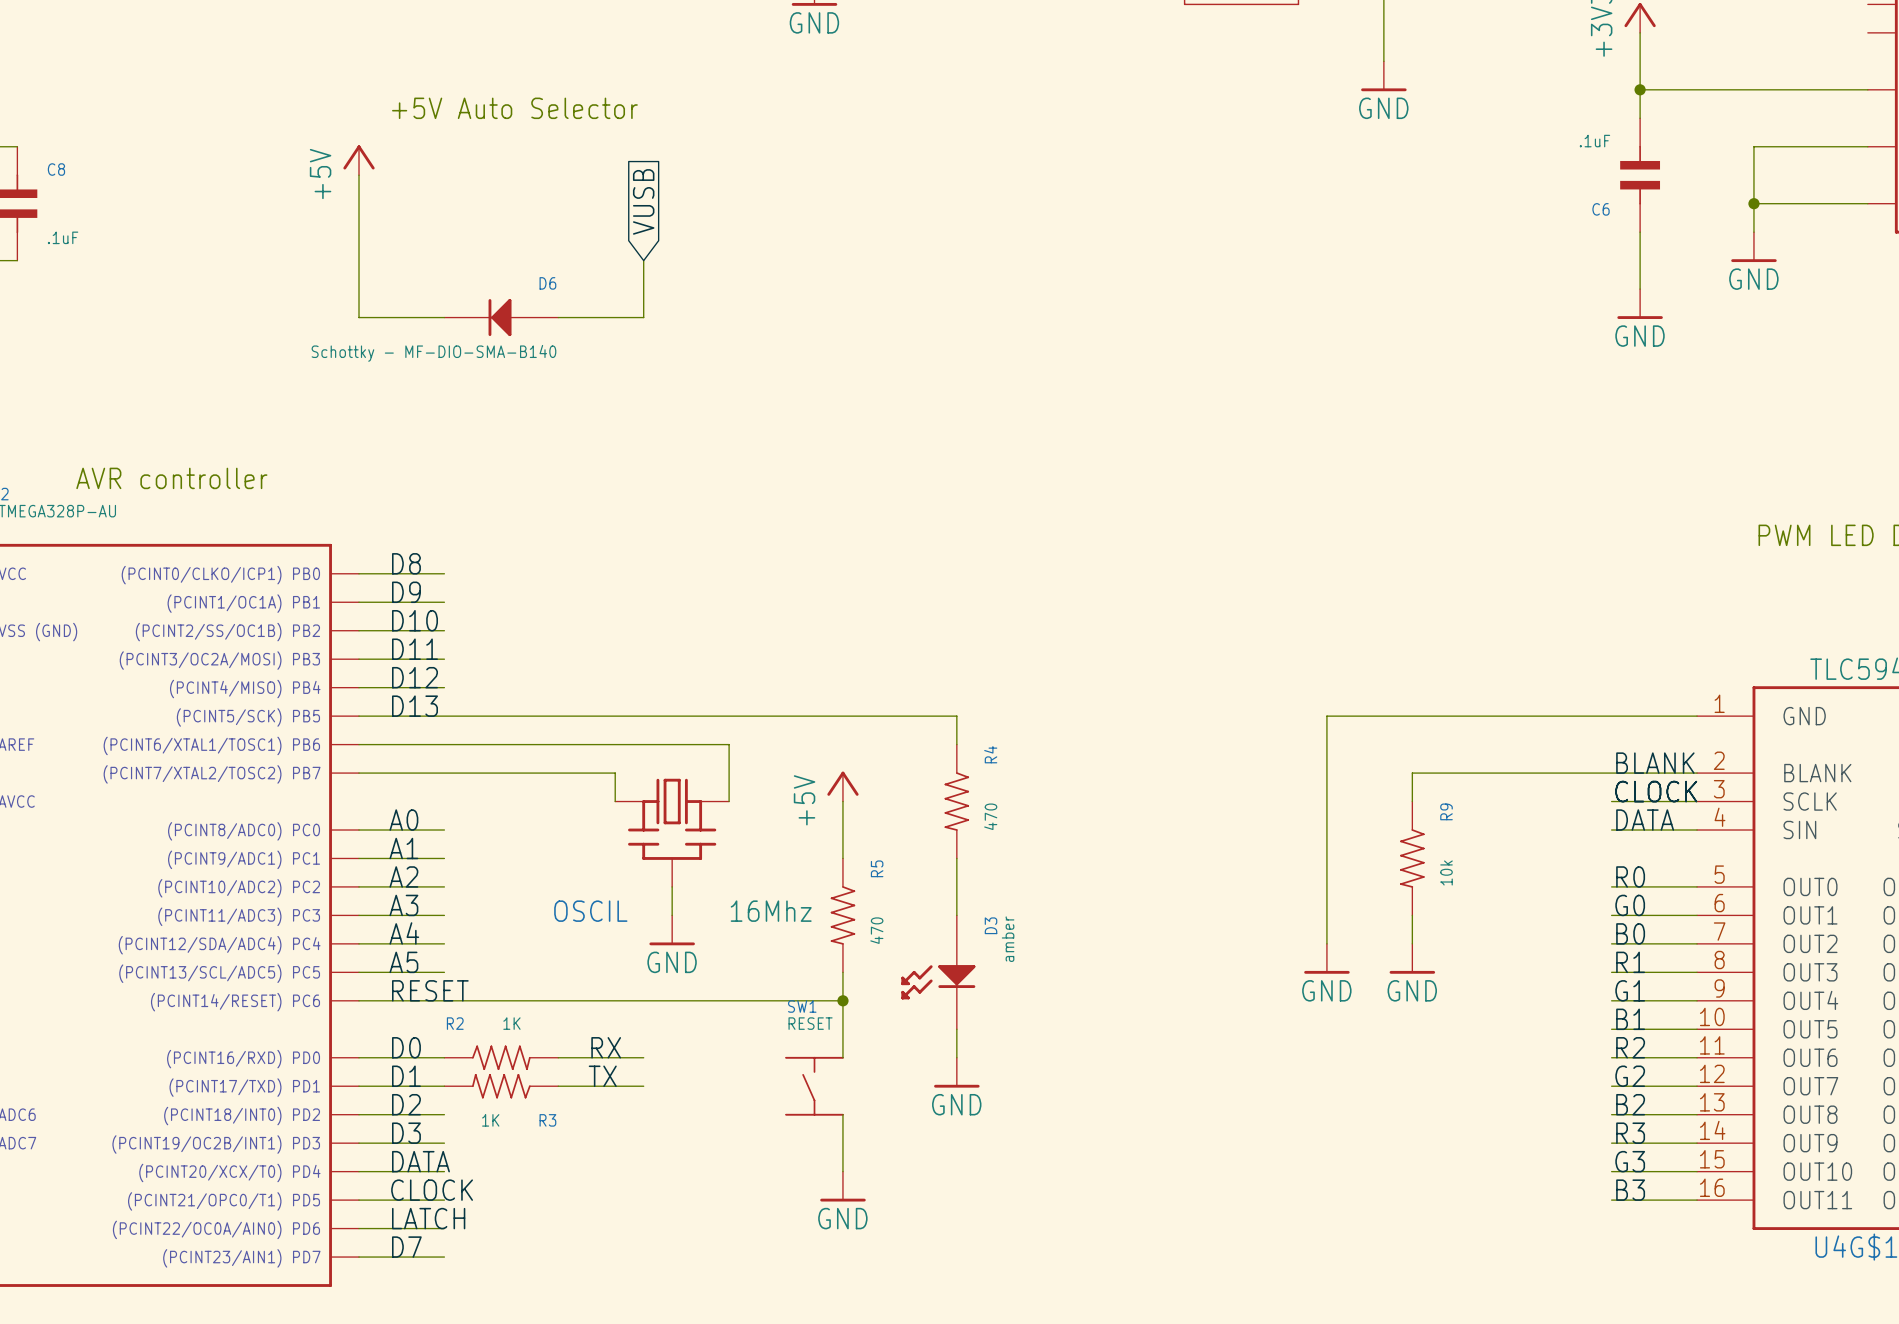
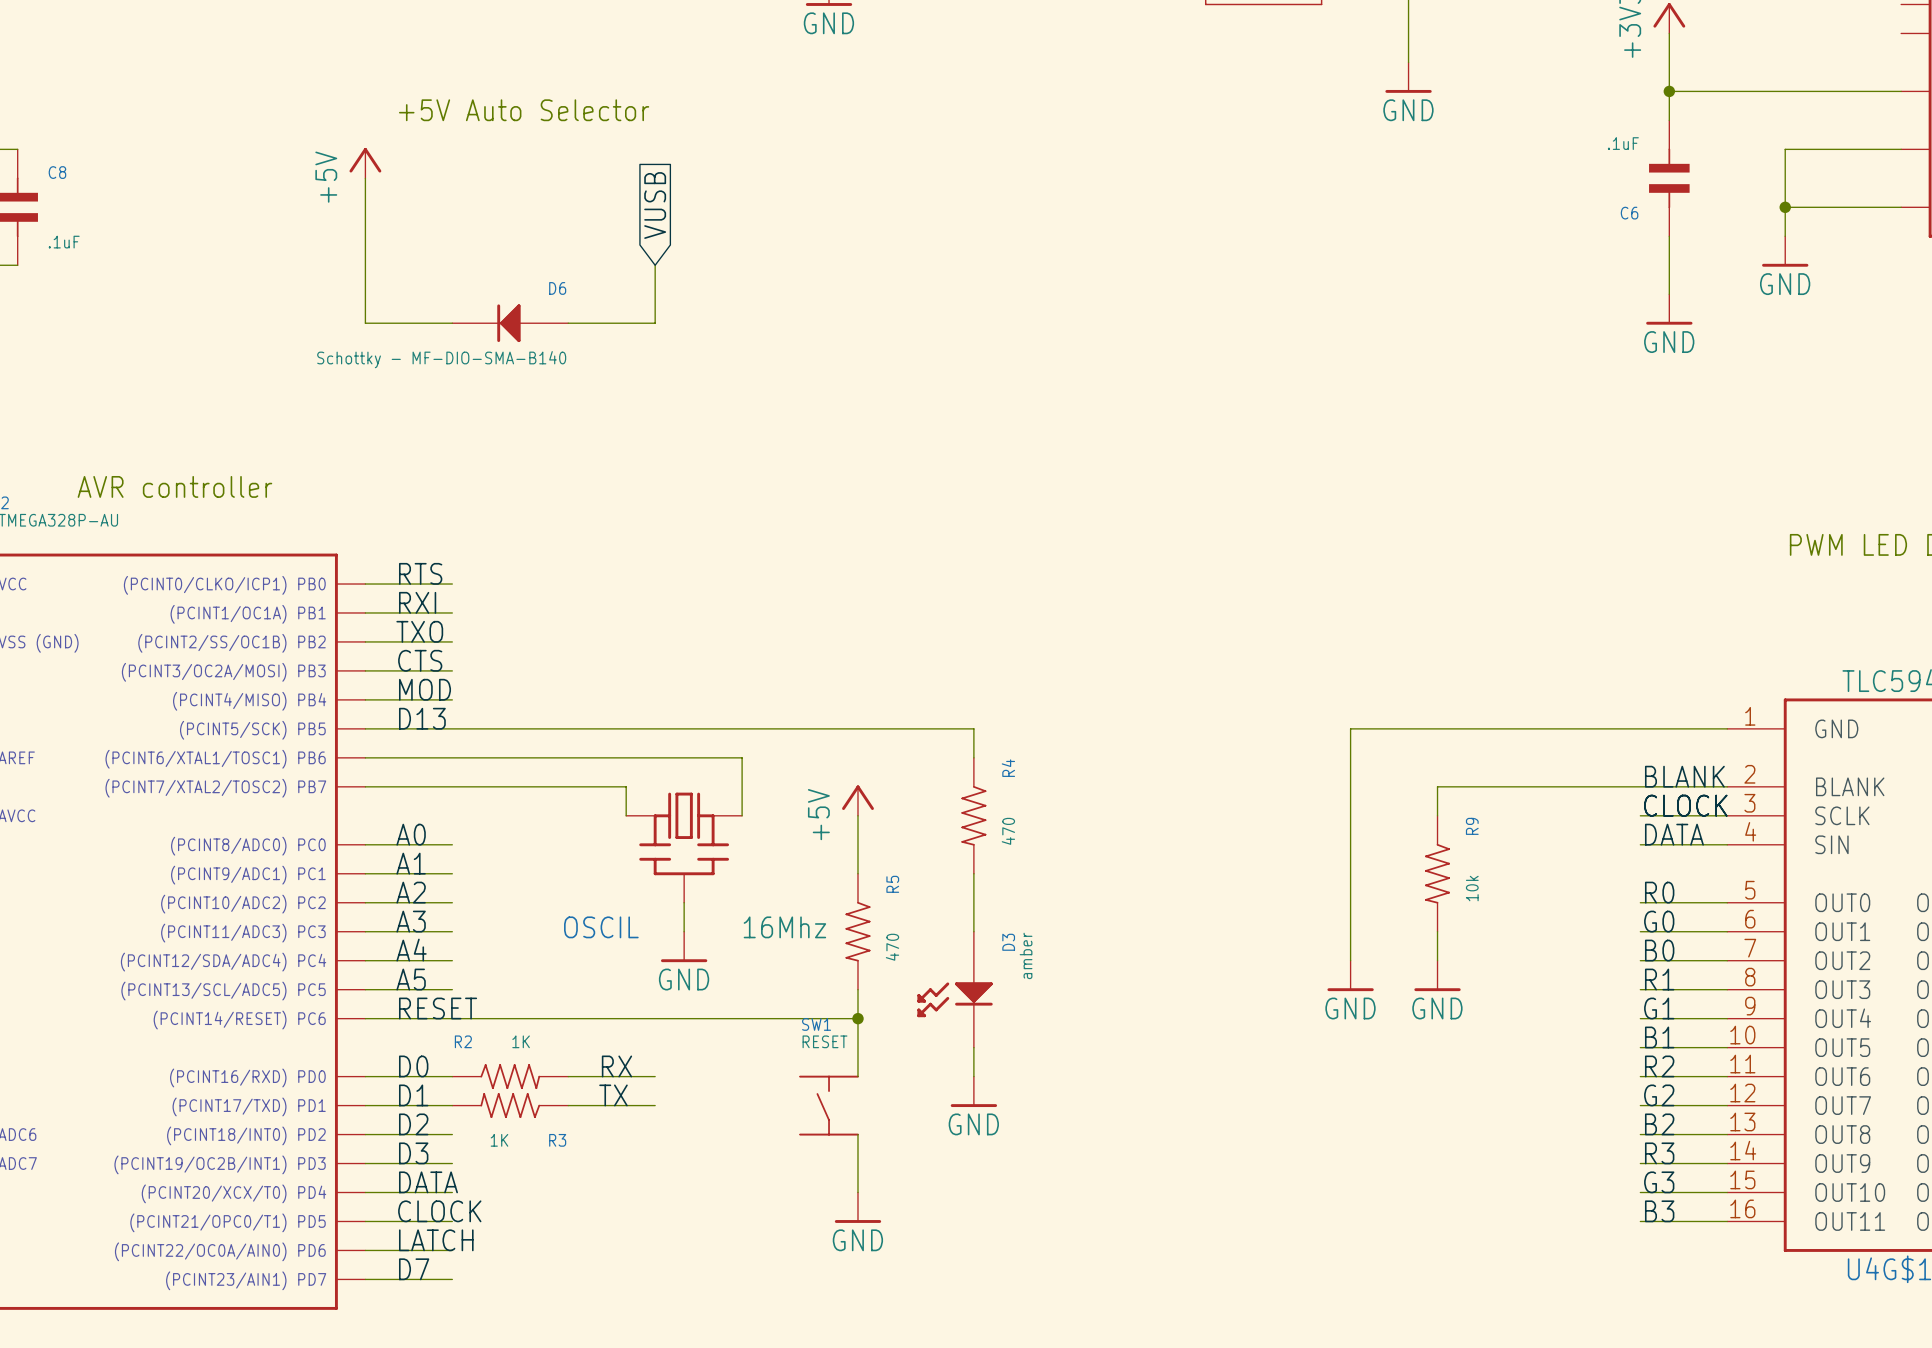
label: D8 (406, 563) -> RTS (420, 573)
label: D9 (406, 592) -> RXI (417, 602)
label: D10 (414, 620) -> TXO (419, 631)
label: D11 (414, 649) -> CTS (420, 660)
label: D12 (414, 677) -> MOD (425, 689)

